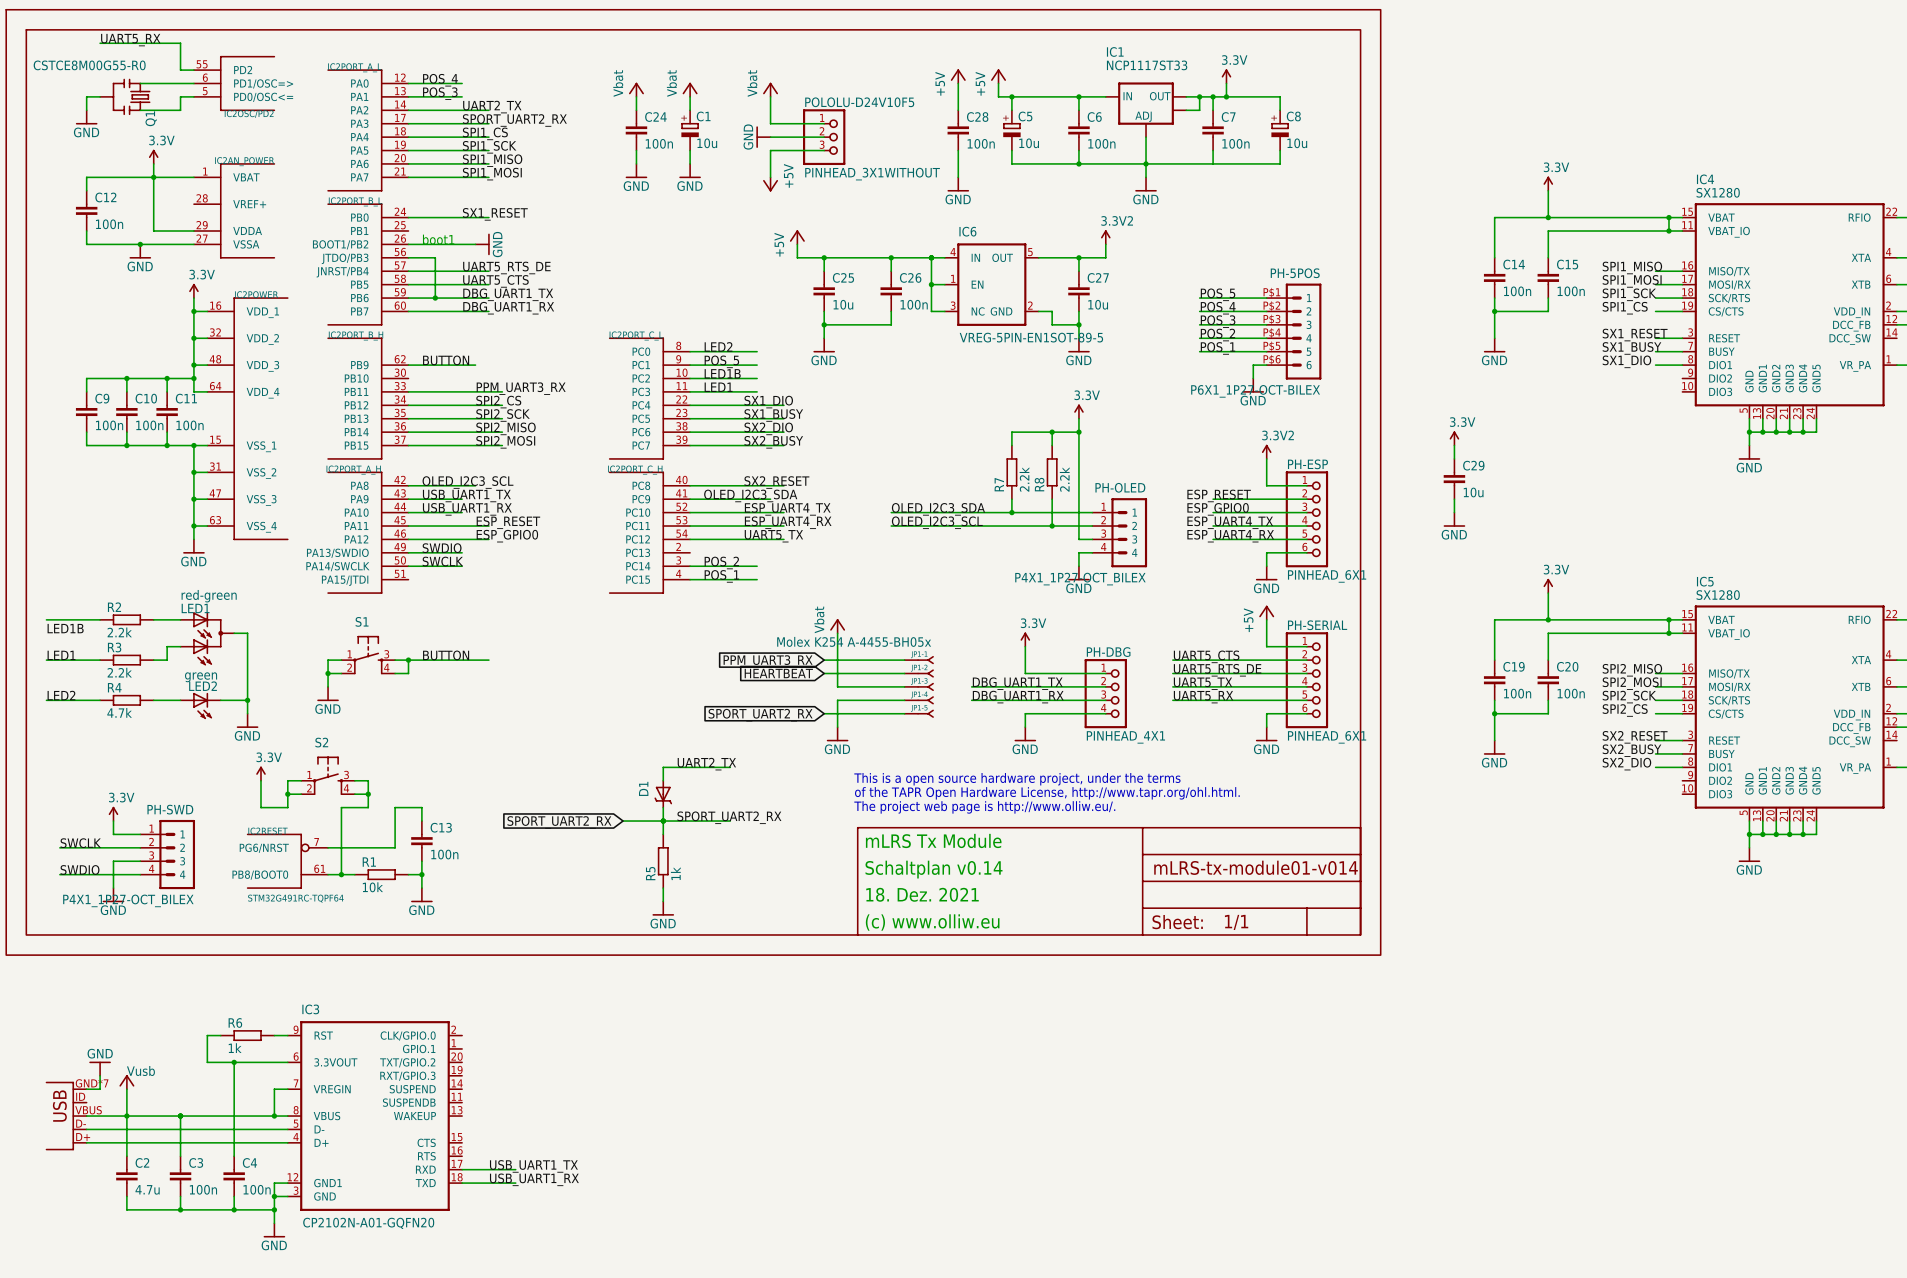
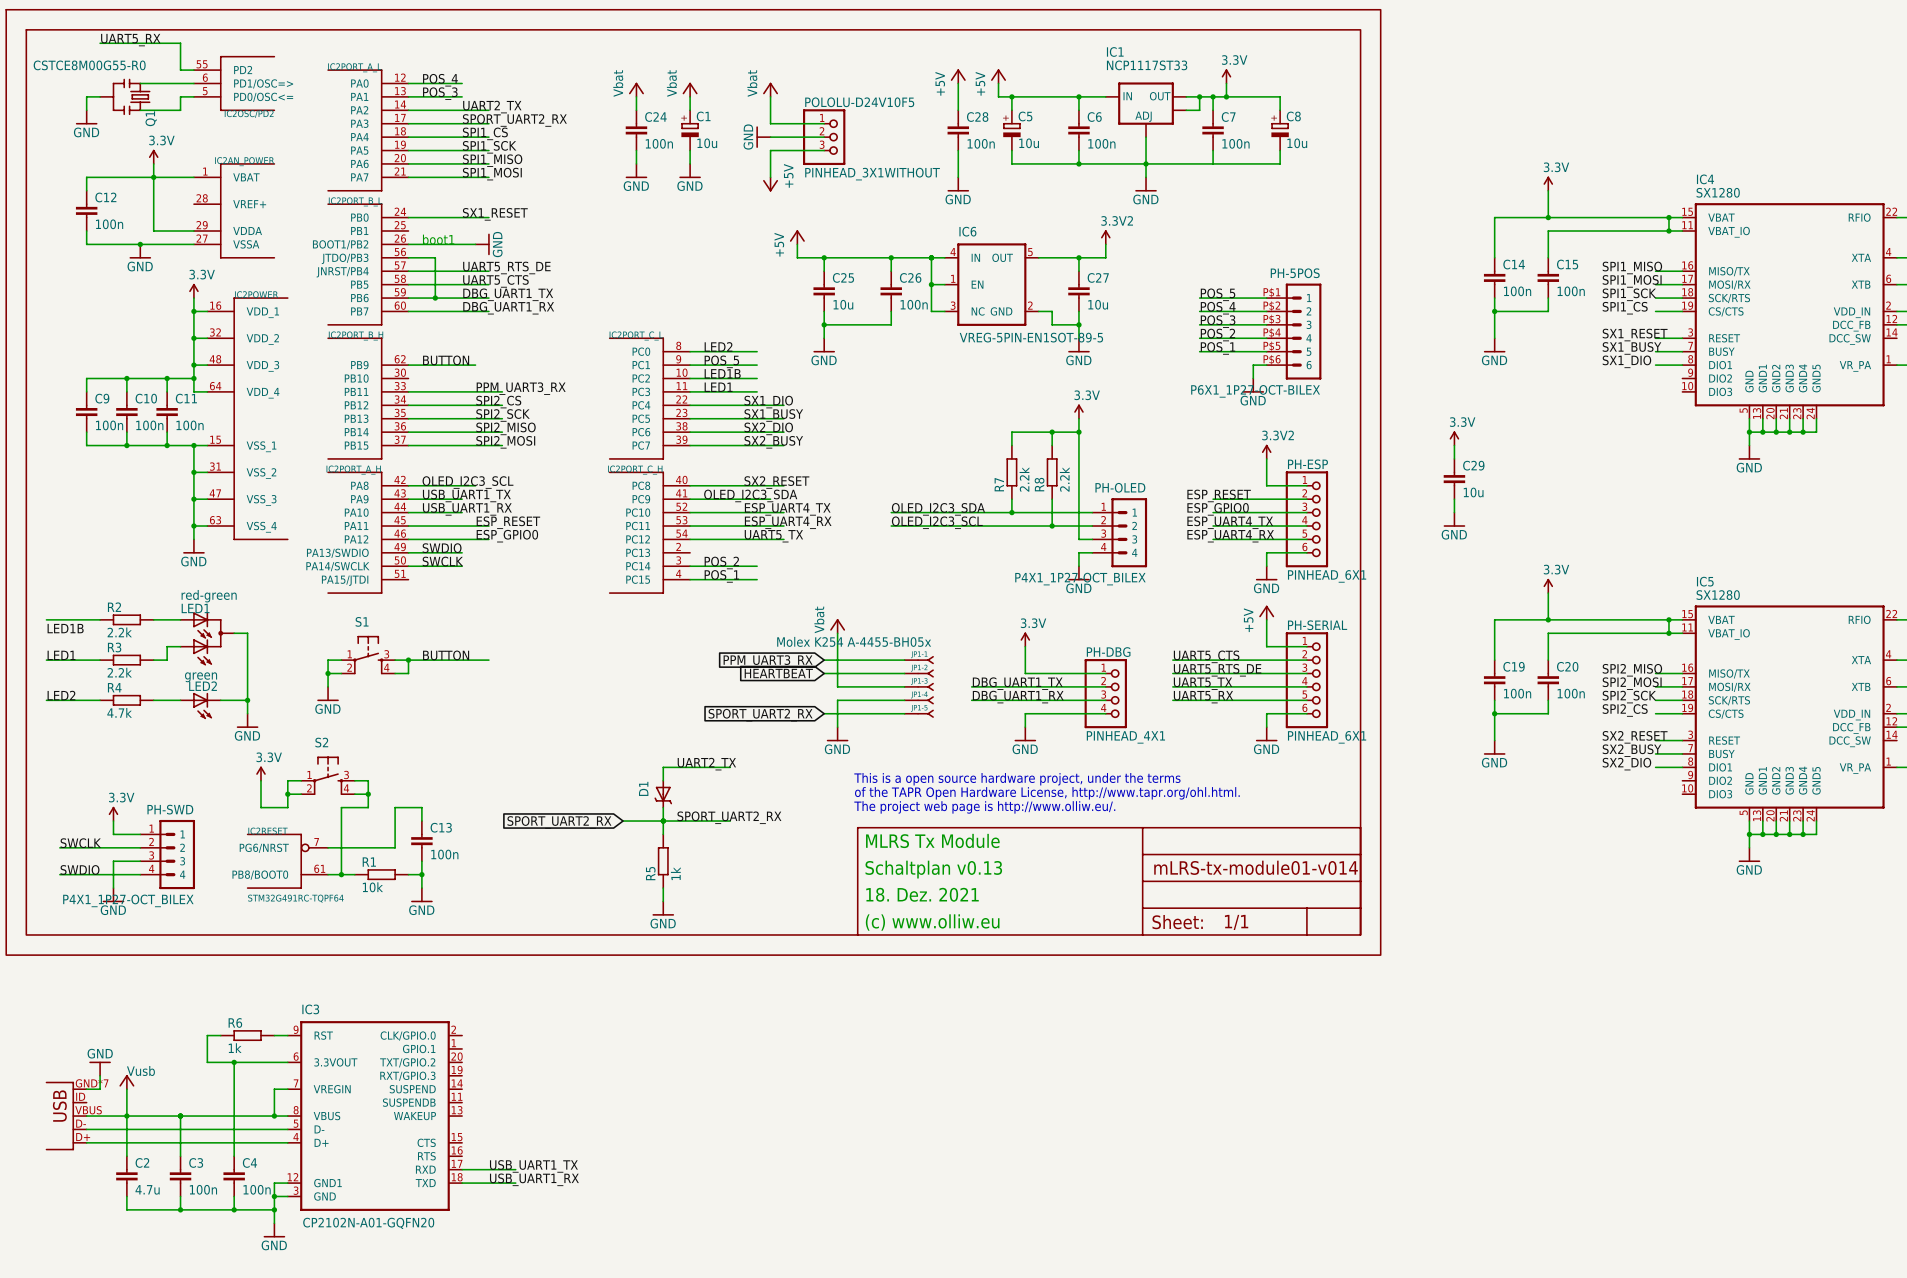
text: mLRS Tx Module (933, 840) -> MLRS Tx Module (932, 840)
text: Schaltplan v0.14 (933, 869) -> Schaltplan v0.13 (933, 869)

